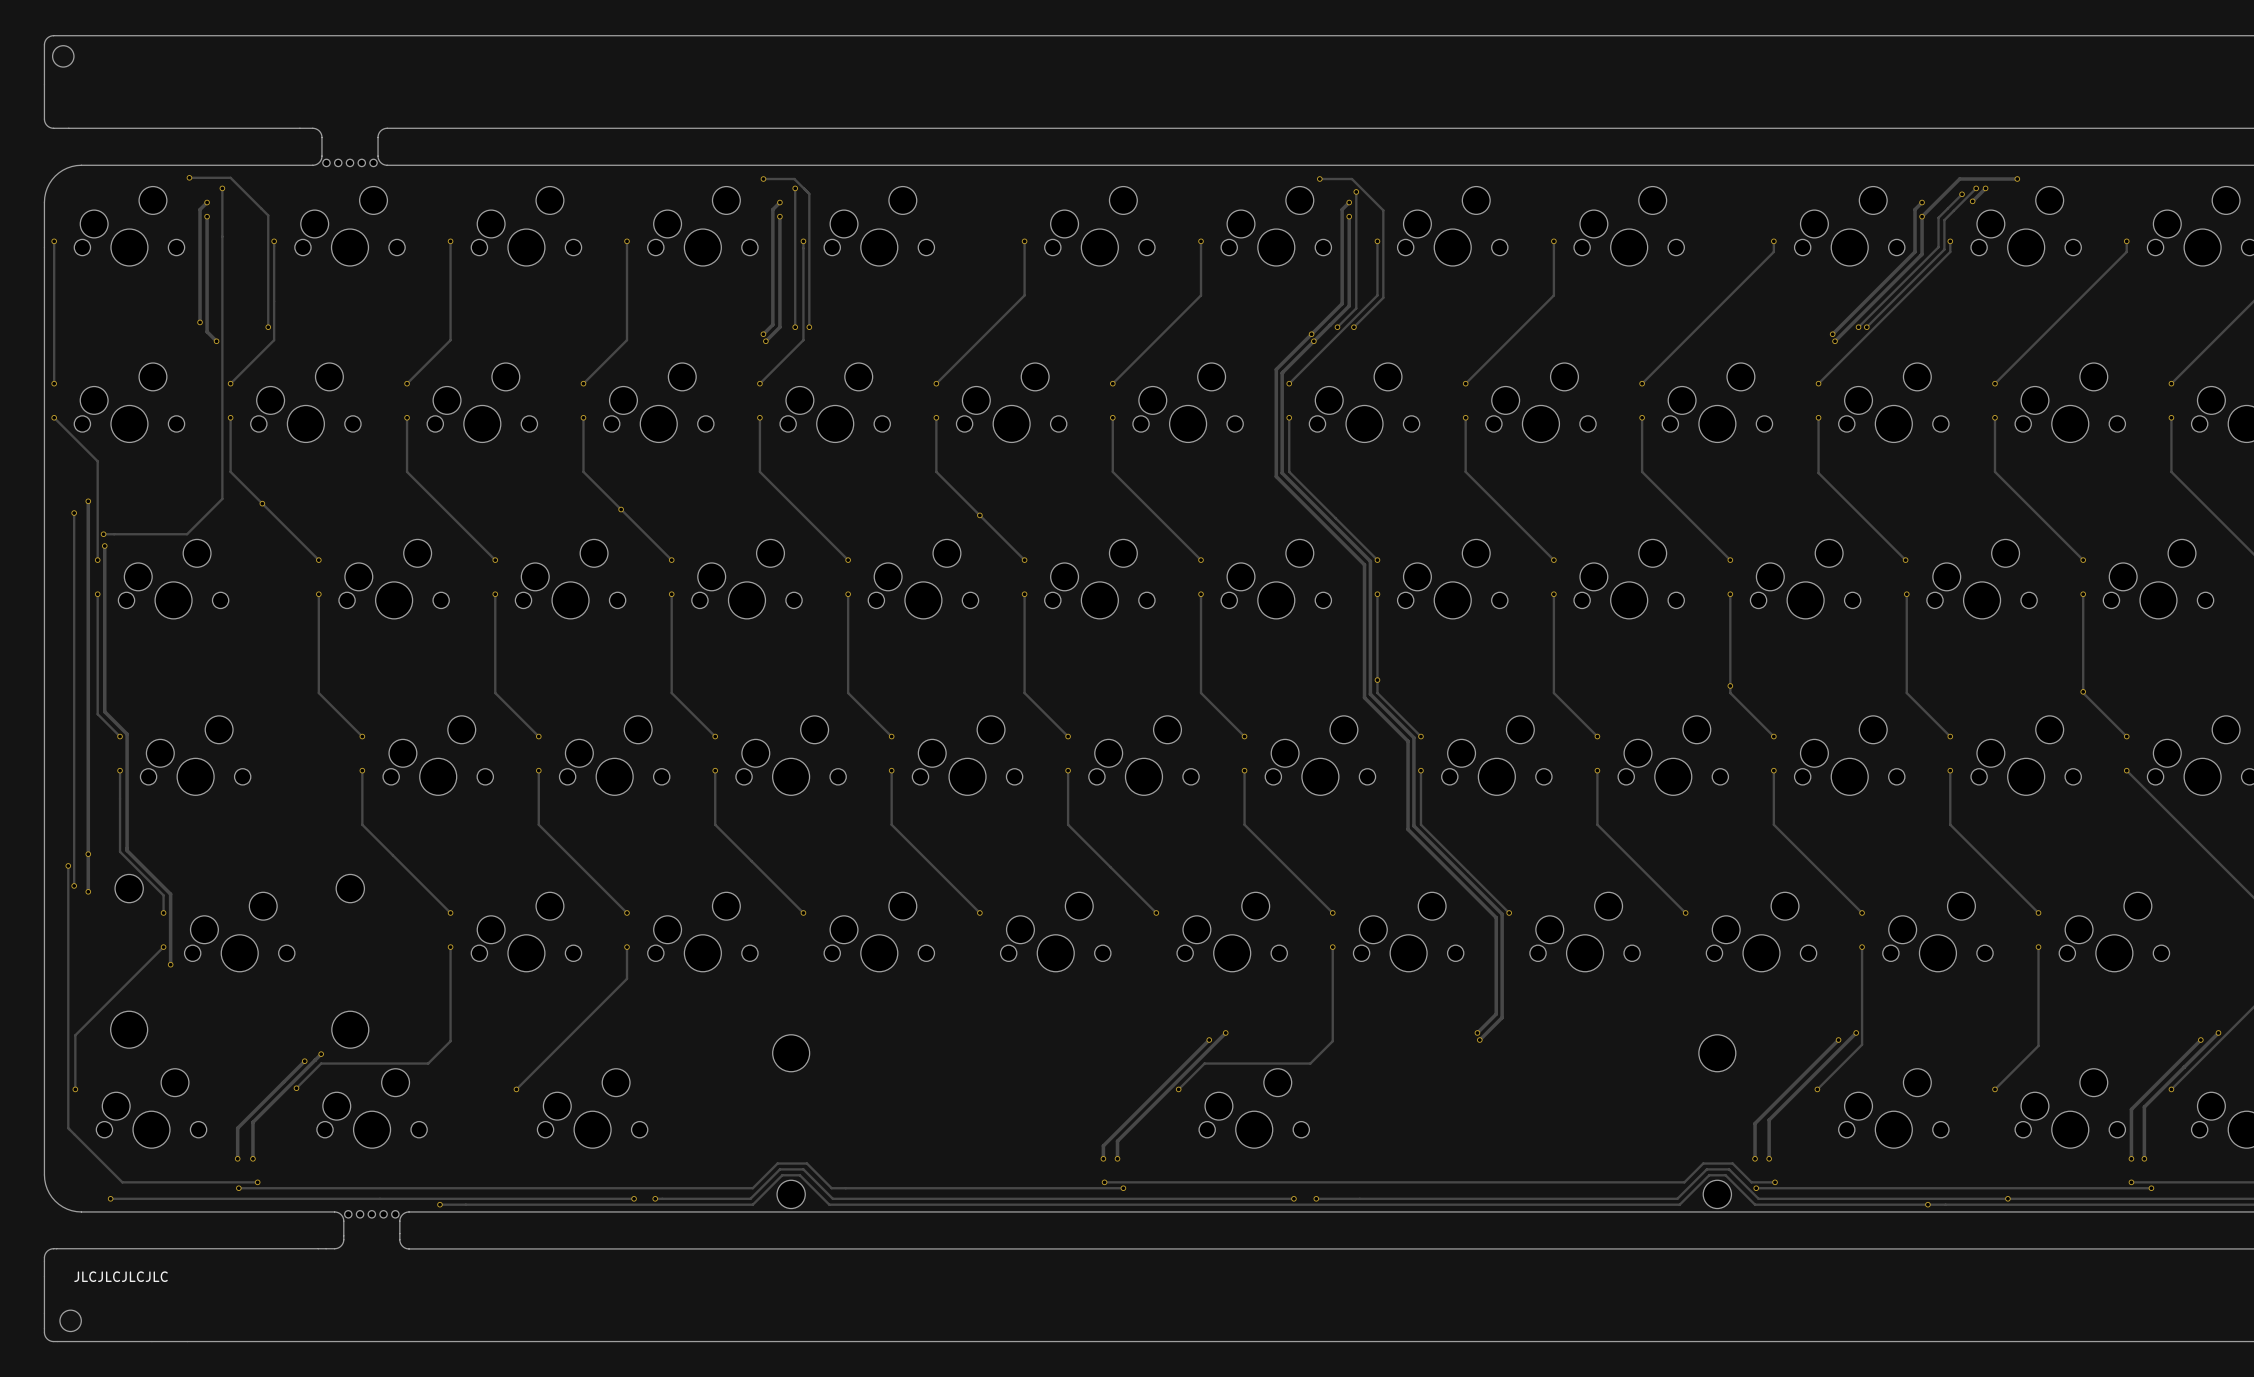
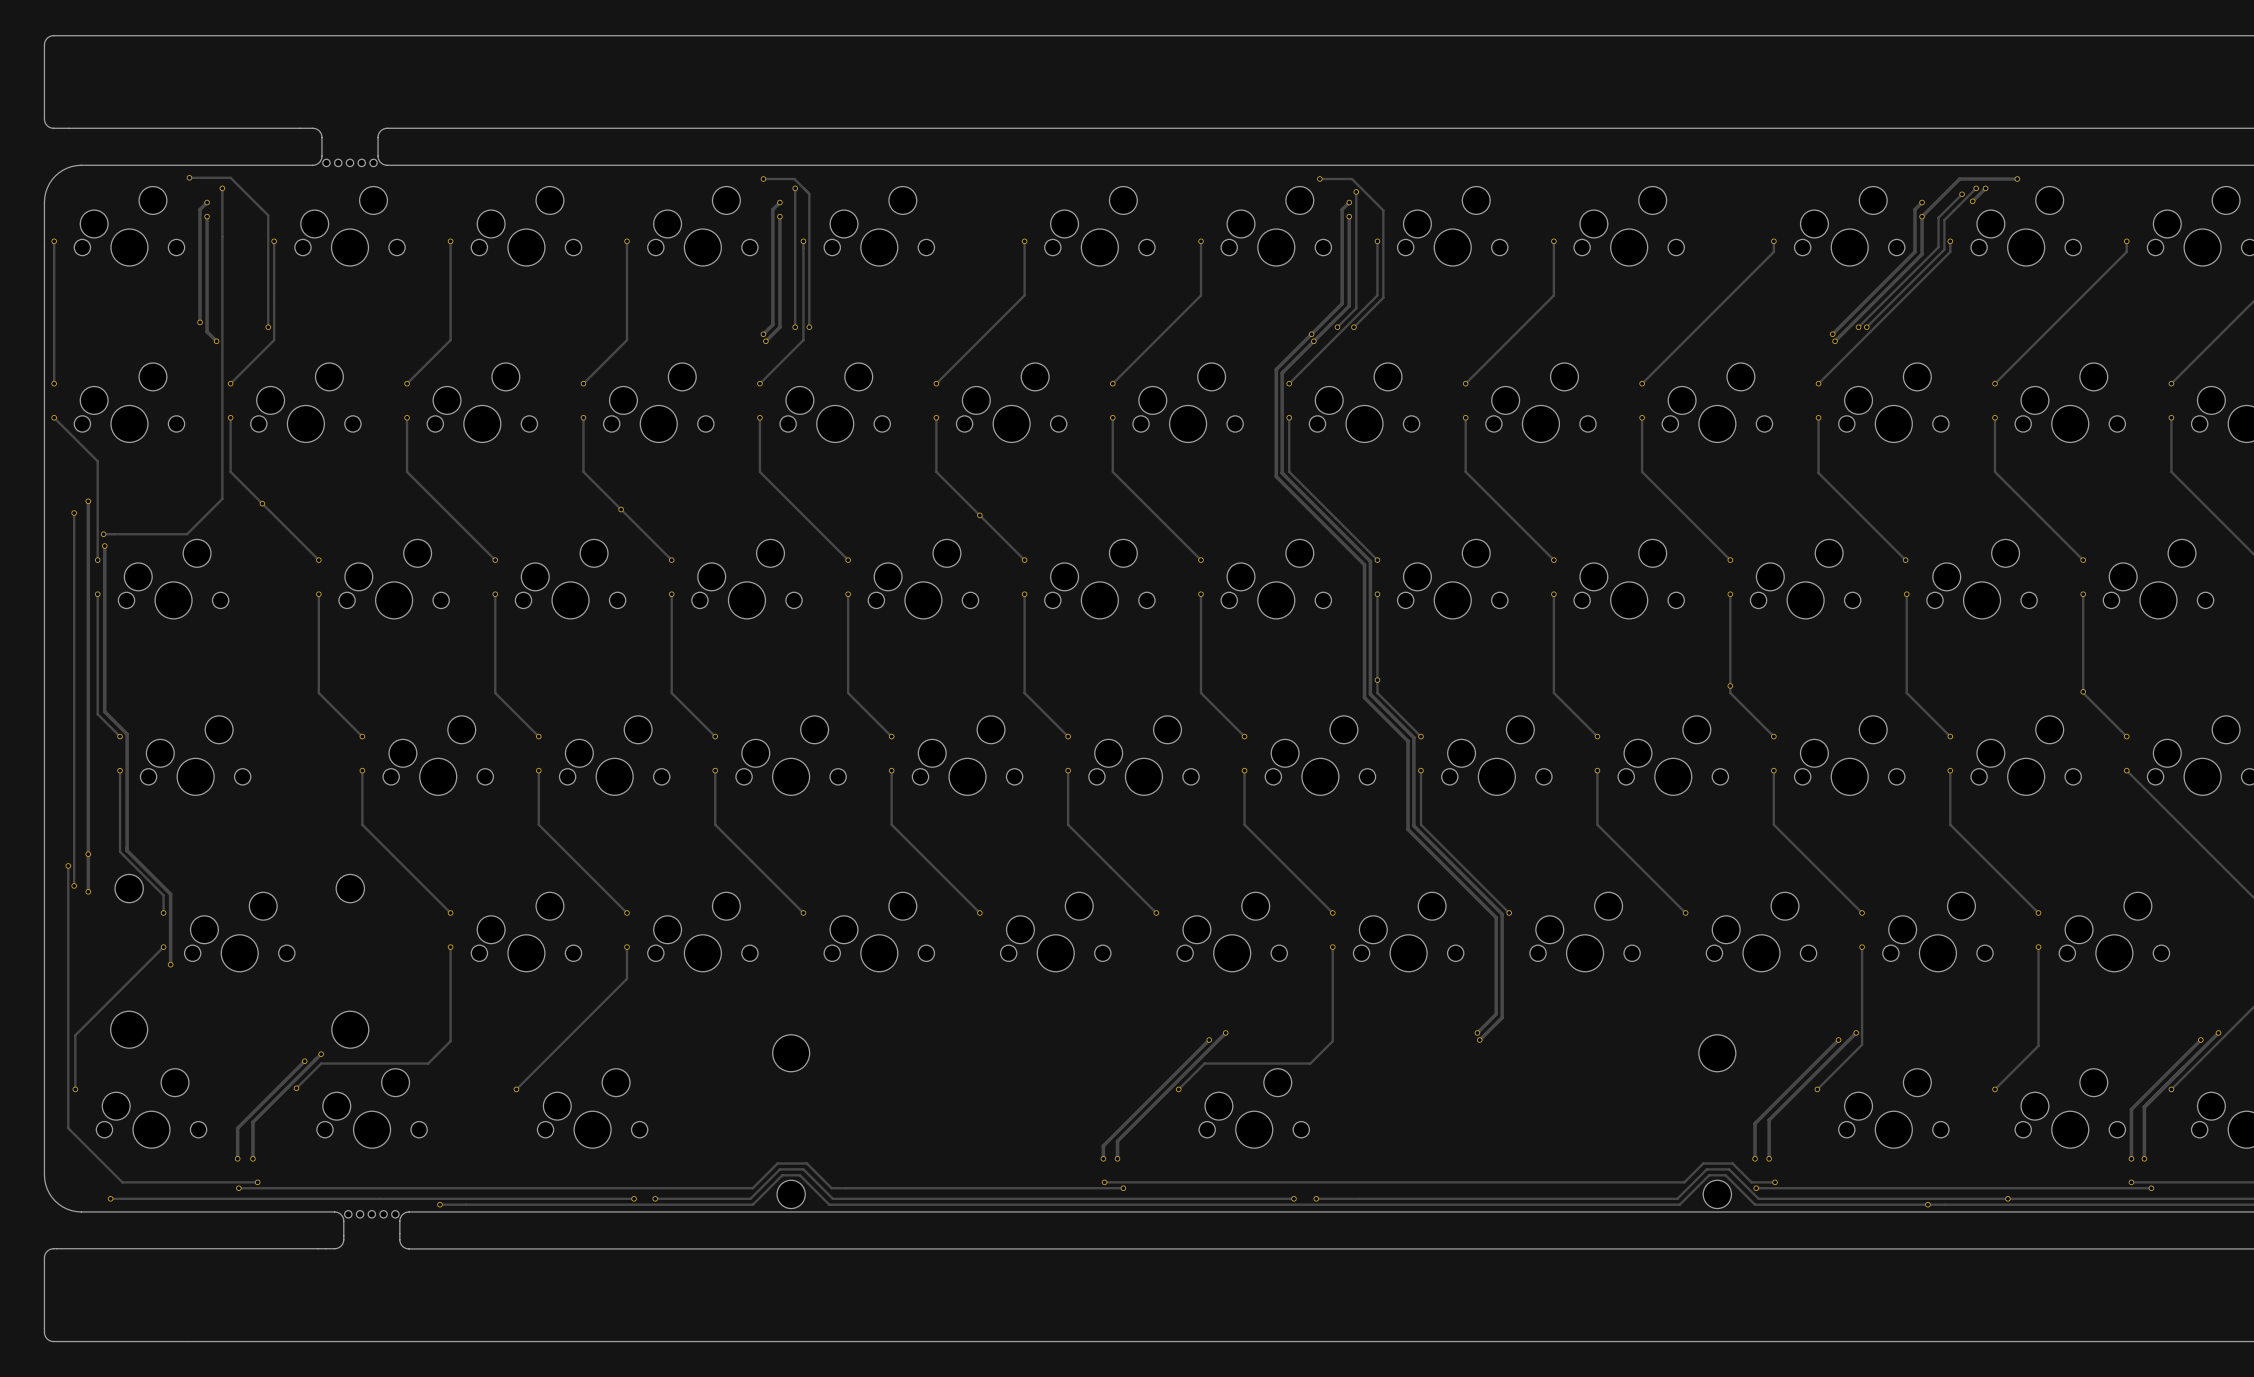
round board edge: [52, 45, 75, 68] -> none
text: JLCJLCJLCJLC (121, 1276) -> none
round board edge: [59, 1309, 82, 1332] -> none

